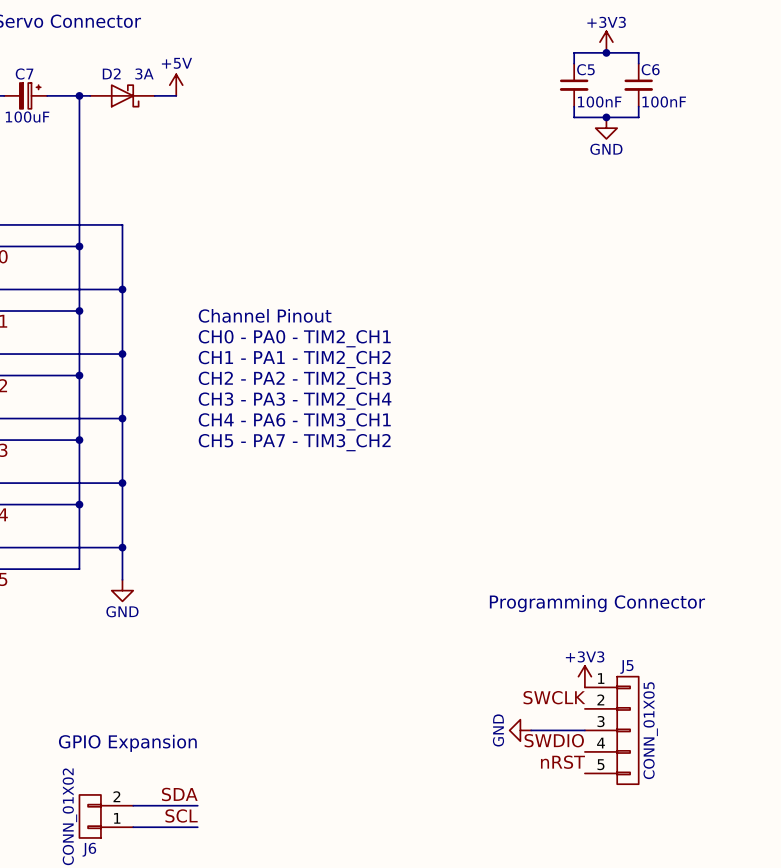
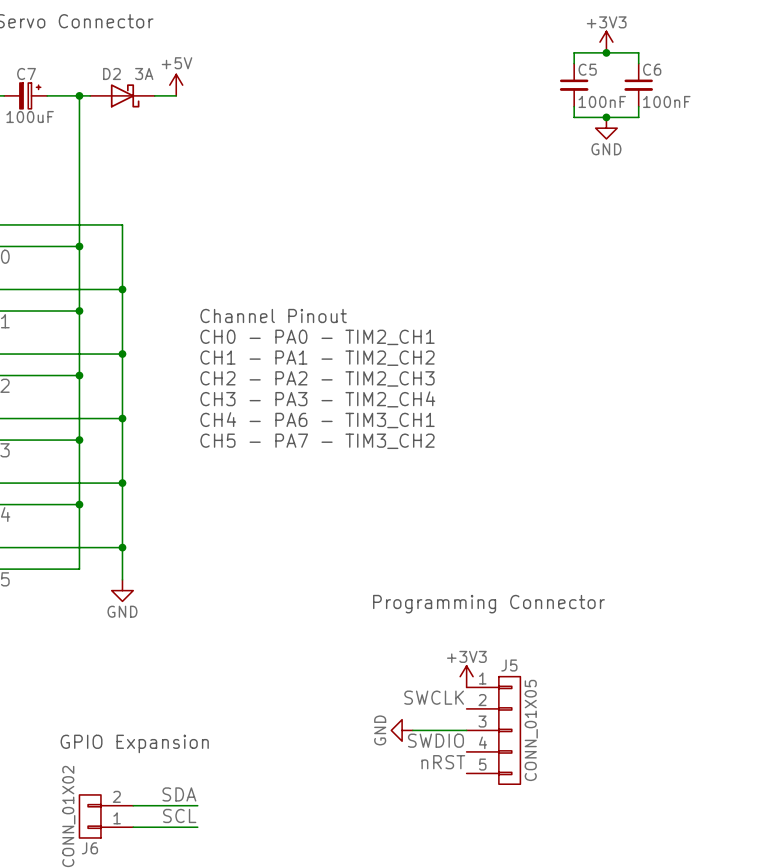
text position: Programming Connector (597, 603) -> Programming Connector (488, 604)
power symbol position: +3V3 (584, 676) -> +3V3 (466, 676)
label position: SWCLK (554, 697) -> SWCLK (434, 697)
power symbol position: GND (520, 730) -> GND (402, 730)
wire: (531, 730) (584, 730) -> (412, 730) (466, 730)
J5 position: (611, 730) -> (493, 730)
label position: SWDIO (554, 740) -> SWDIO (435, 740)
label position: nRST (562, 762) -> nRST (443, 762)

